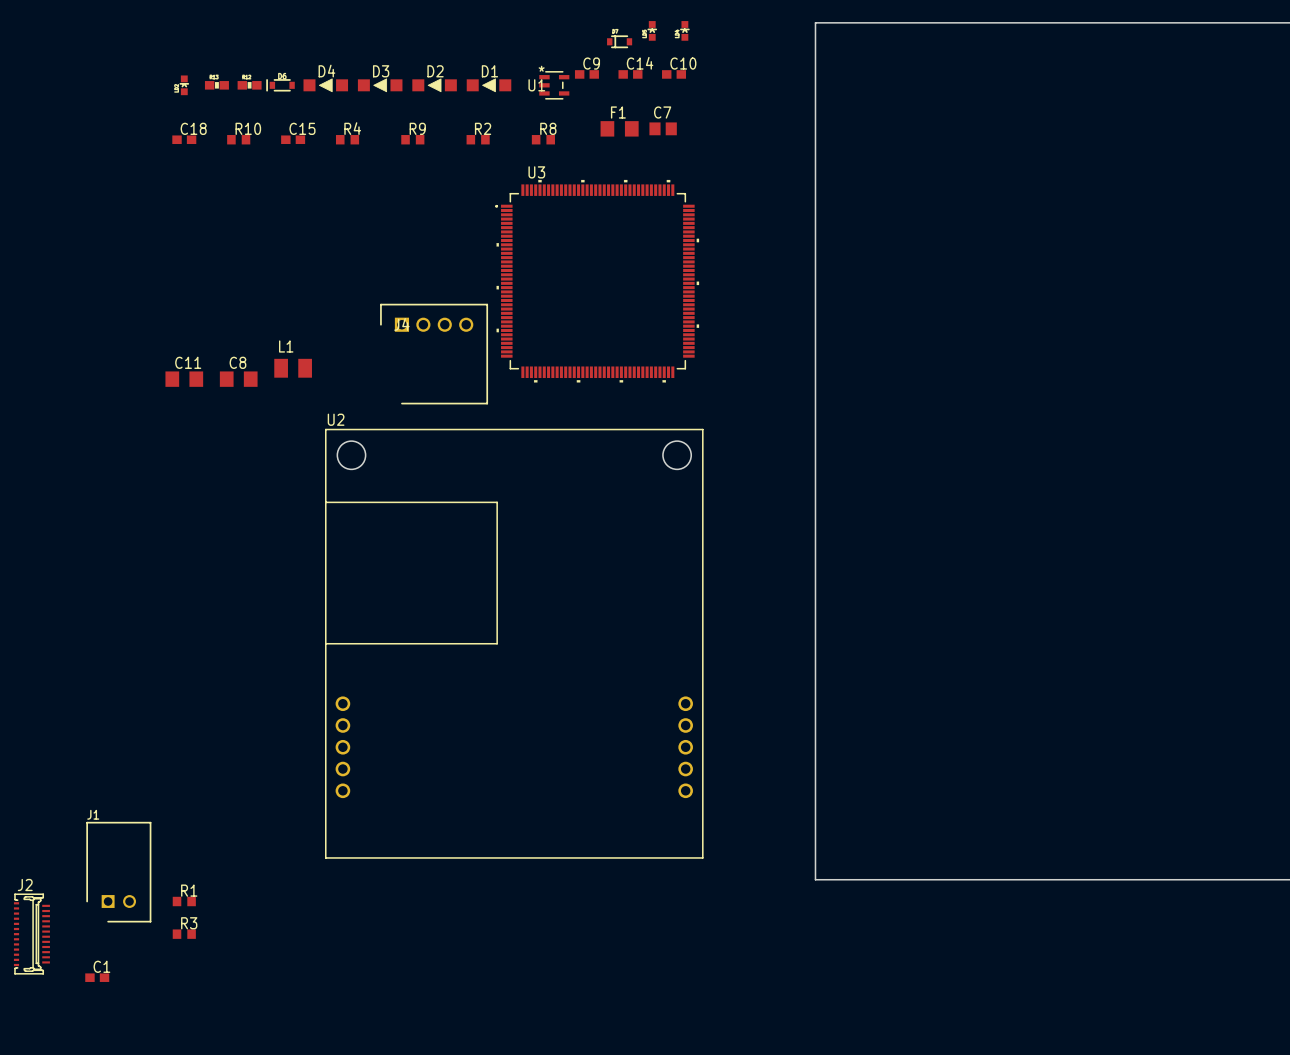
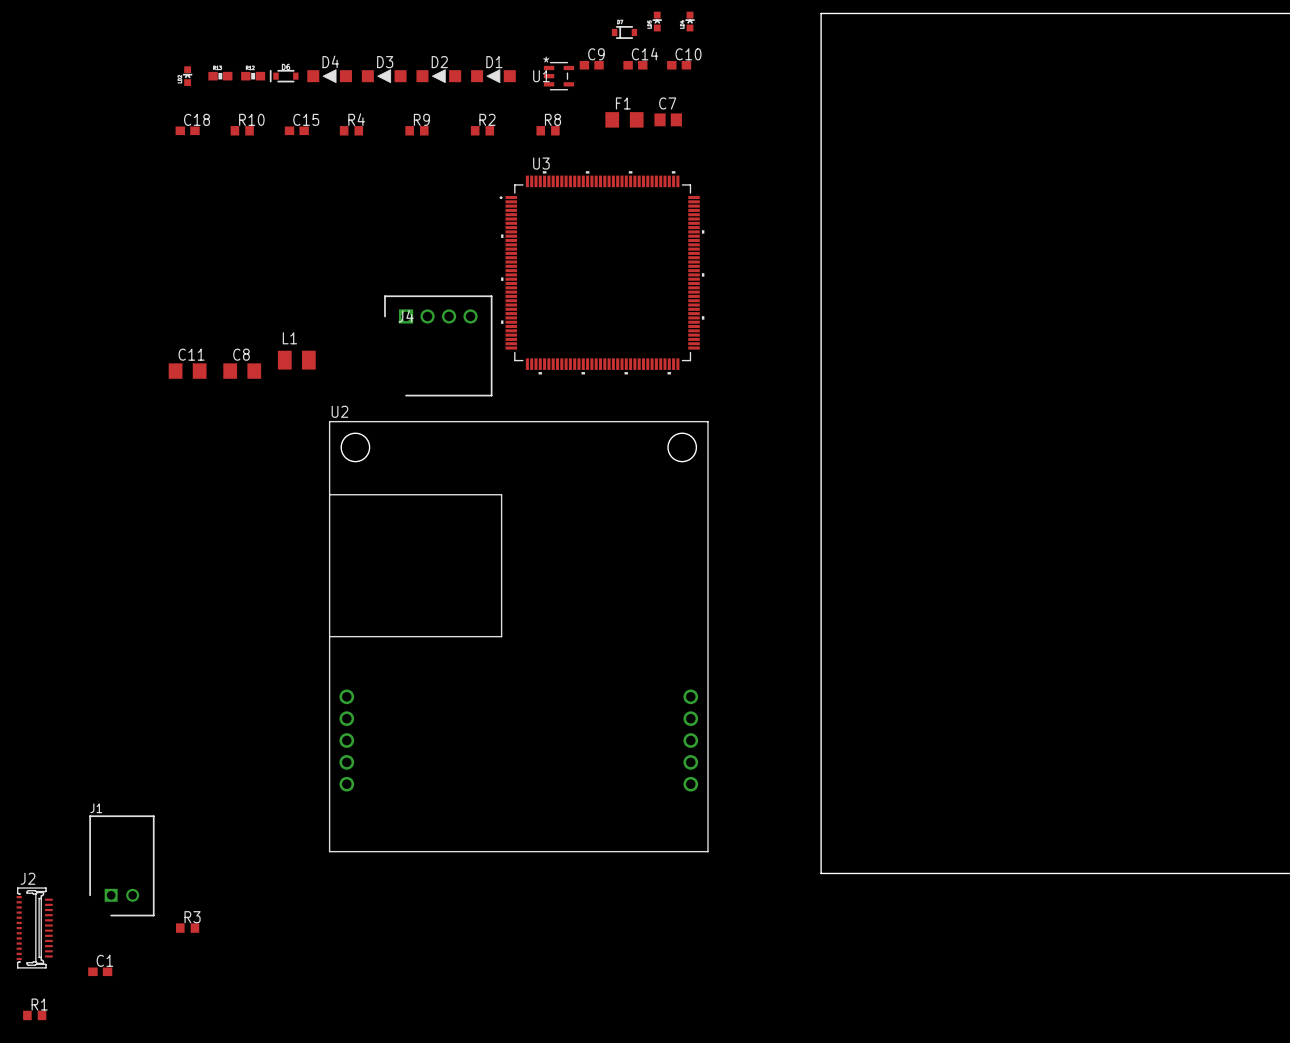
R1 position: (184, 901) -> (34, 1015)

